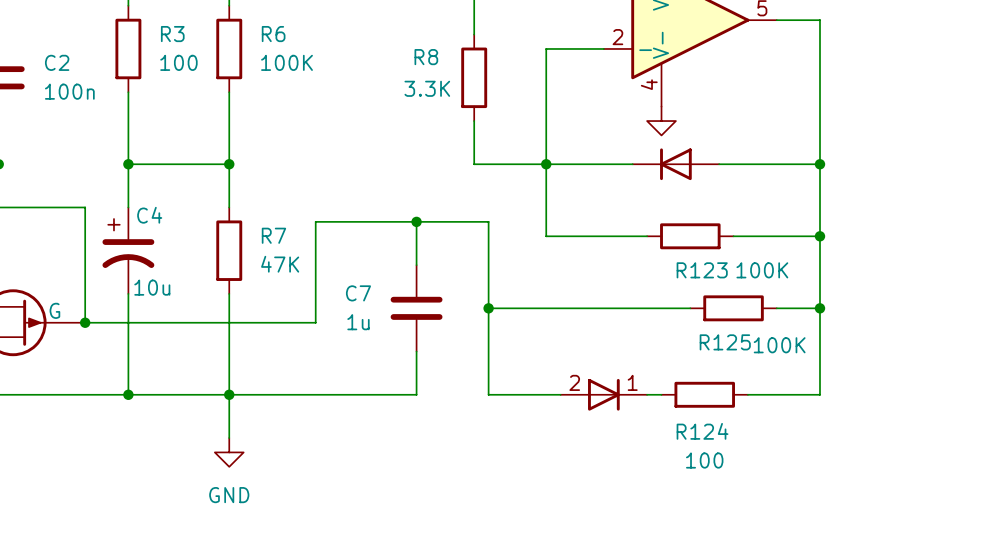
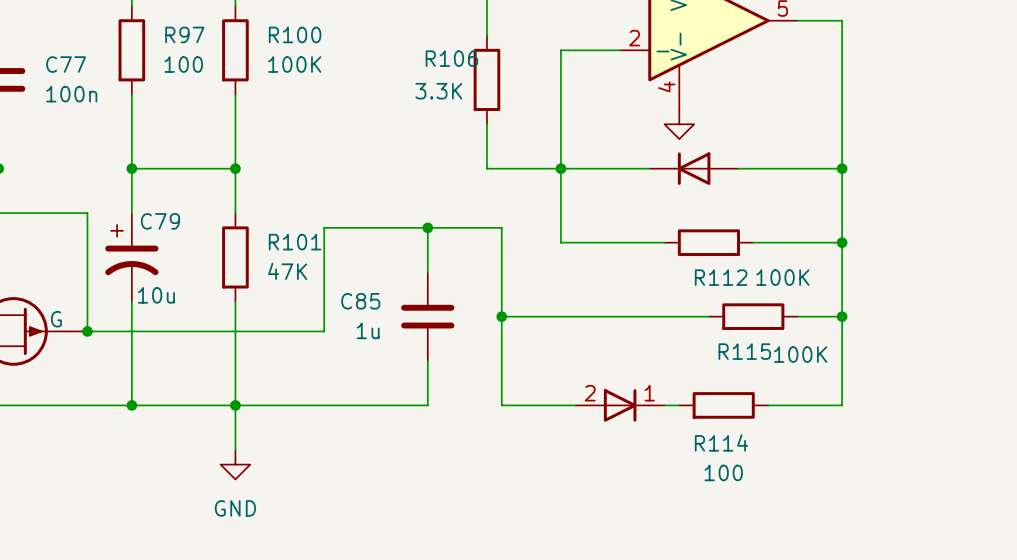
R3 name: R3 (172, 34) -> R97 (184, 34)
R6 name: R6 (273, 34) -> R100 (295, 34)
R8 name: R8 (426, 57) -> R106 (451, 58)
C2 name: C2 (57, 62) -> C77 (66, 64)
C4 name: C4 (149, 215) -> C79 (160, 221)
R7 name: R7 (273, 235) -> R101 (295, 242)
R123 name: R123 (702, 270) -> R112 (721, 277)
C7 name: C7 (358, 293) -> C85 (360, 301)
R125 name: R125 (725, 342) -> R115 (744, 351)
R124 name: R124 (702, 431) -> R114 (721, 442)

